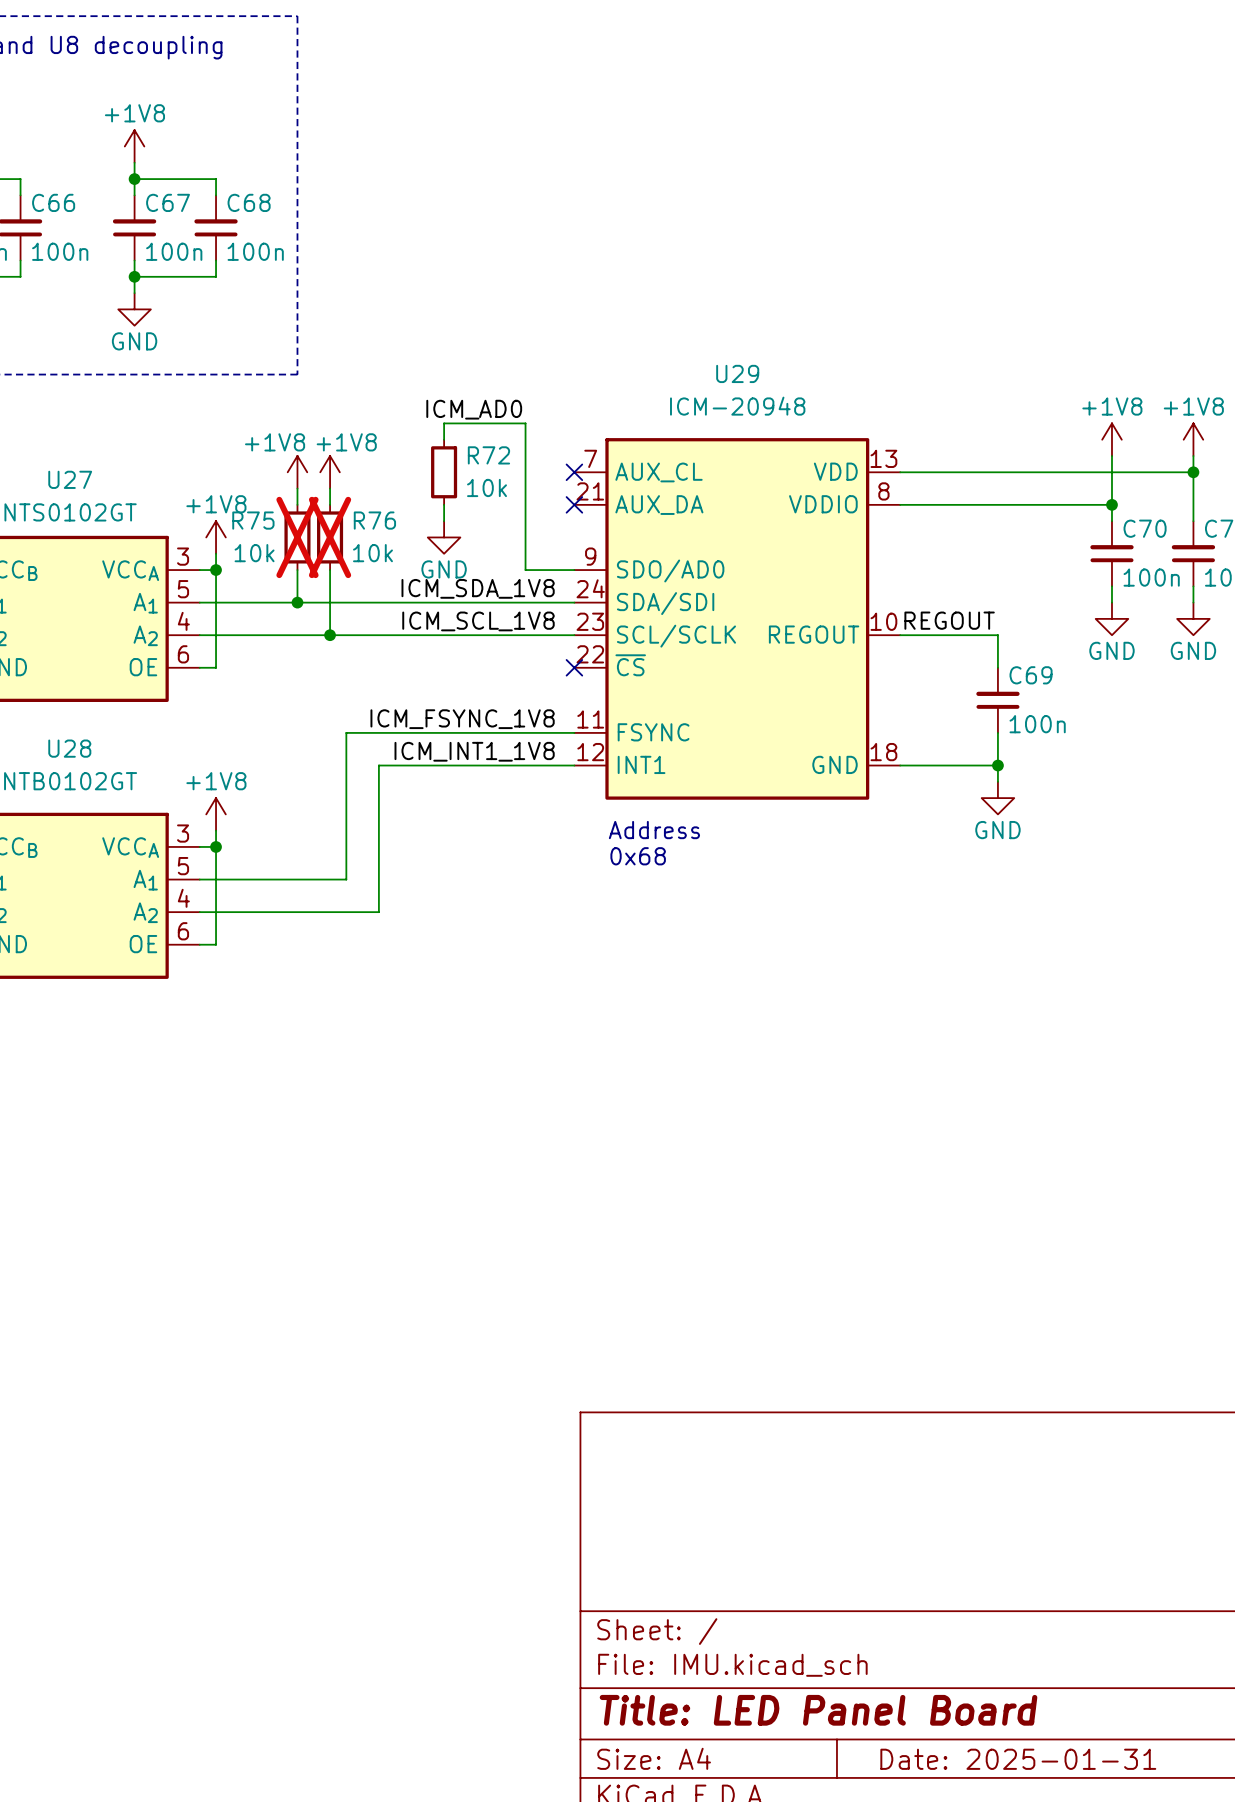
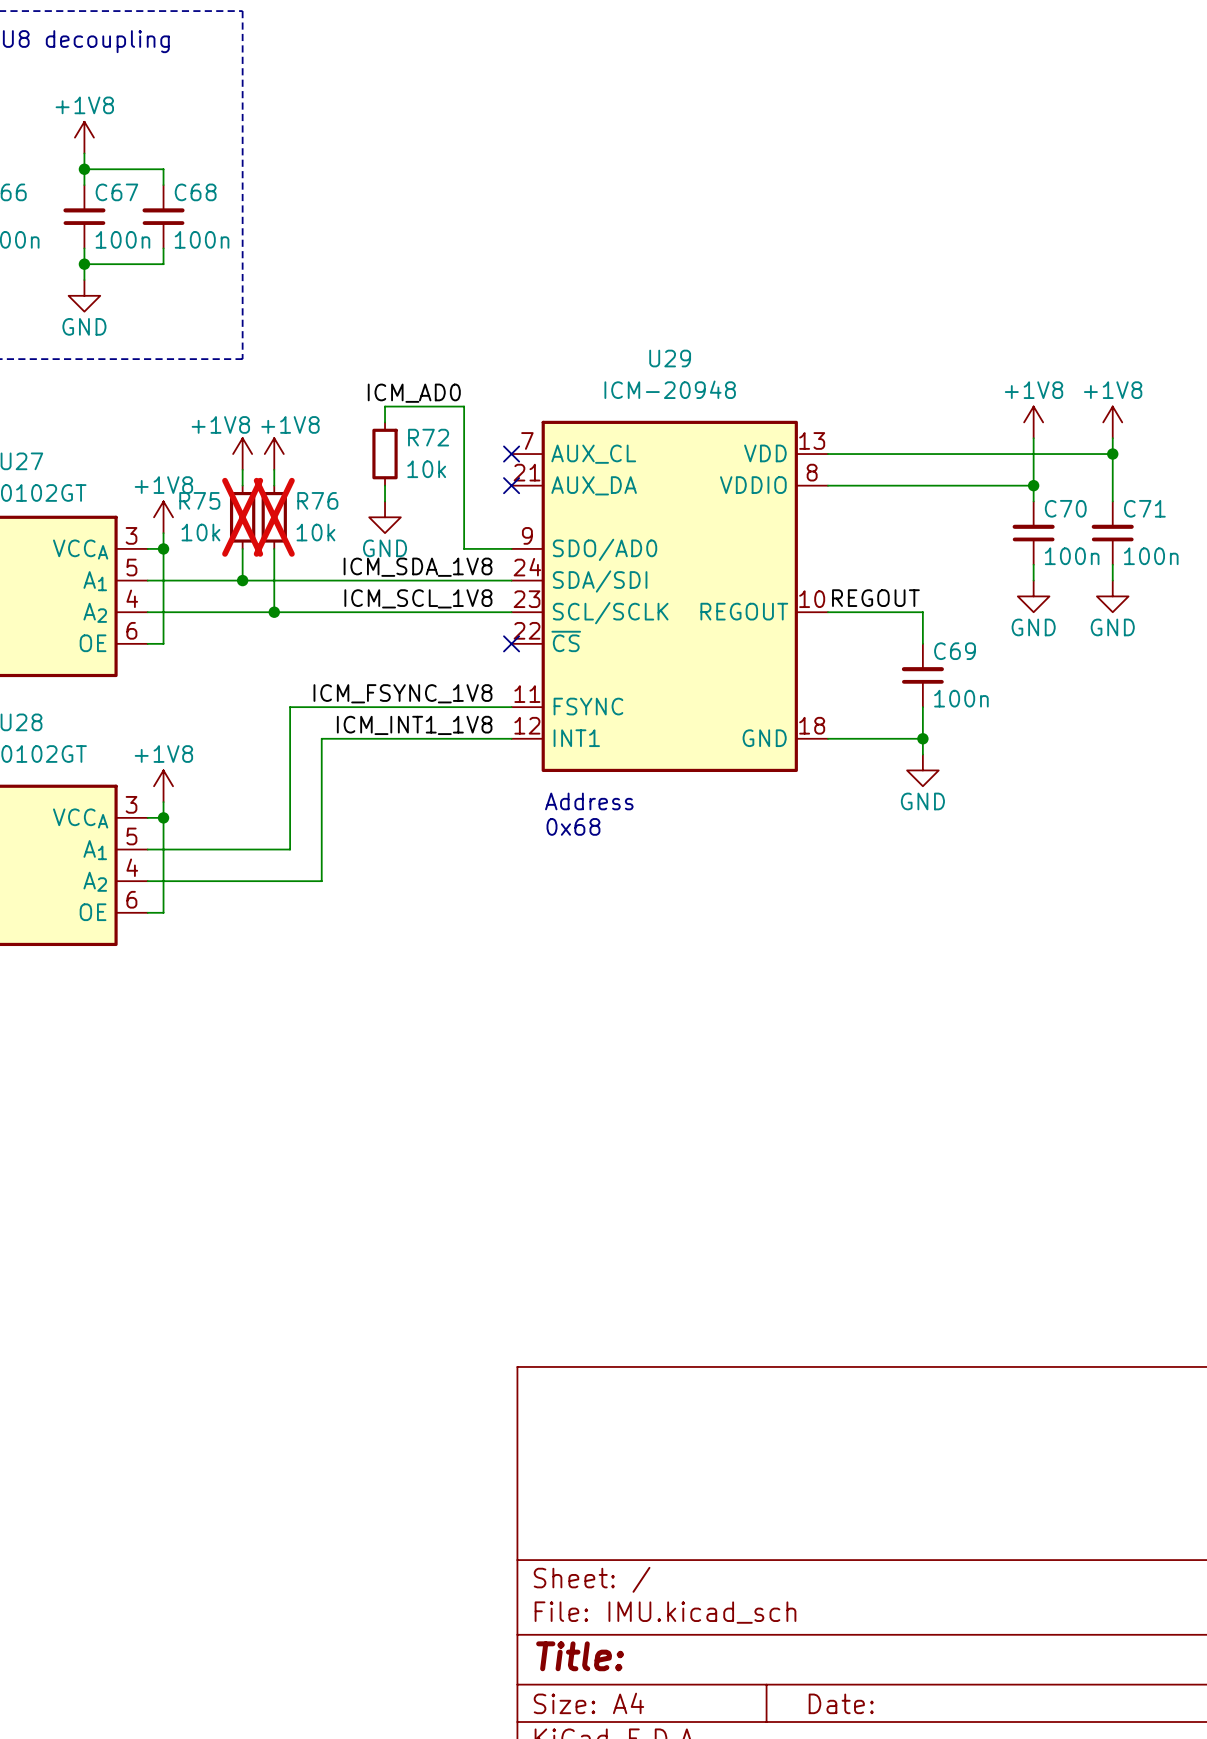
title block: Title: LED Panel Board (818, 1710) -> Title: (580, 1656)
title block: Date: 2025-01-31 (1018, 1759) -> Date: (841, 1703)

